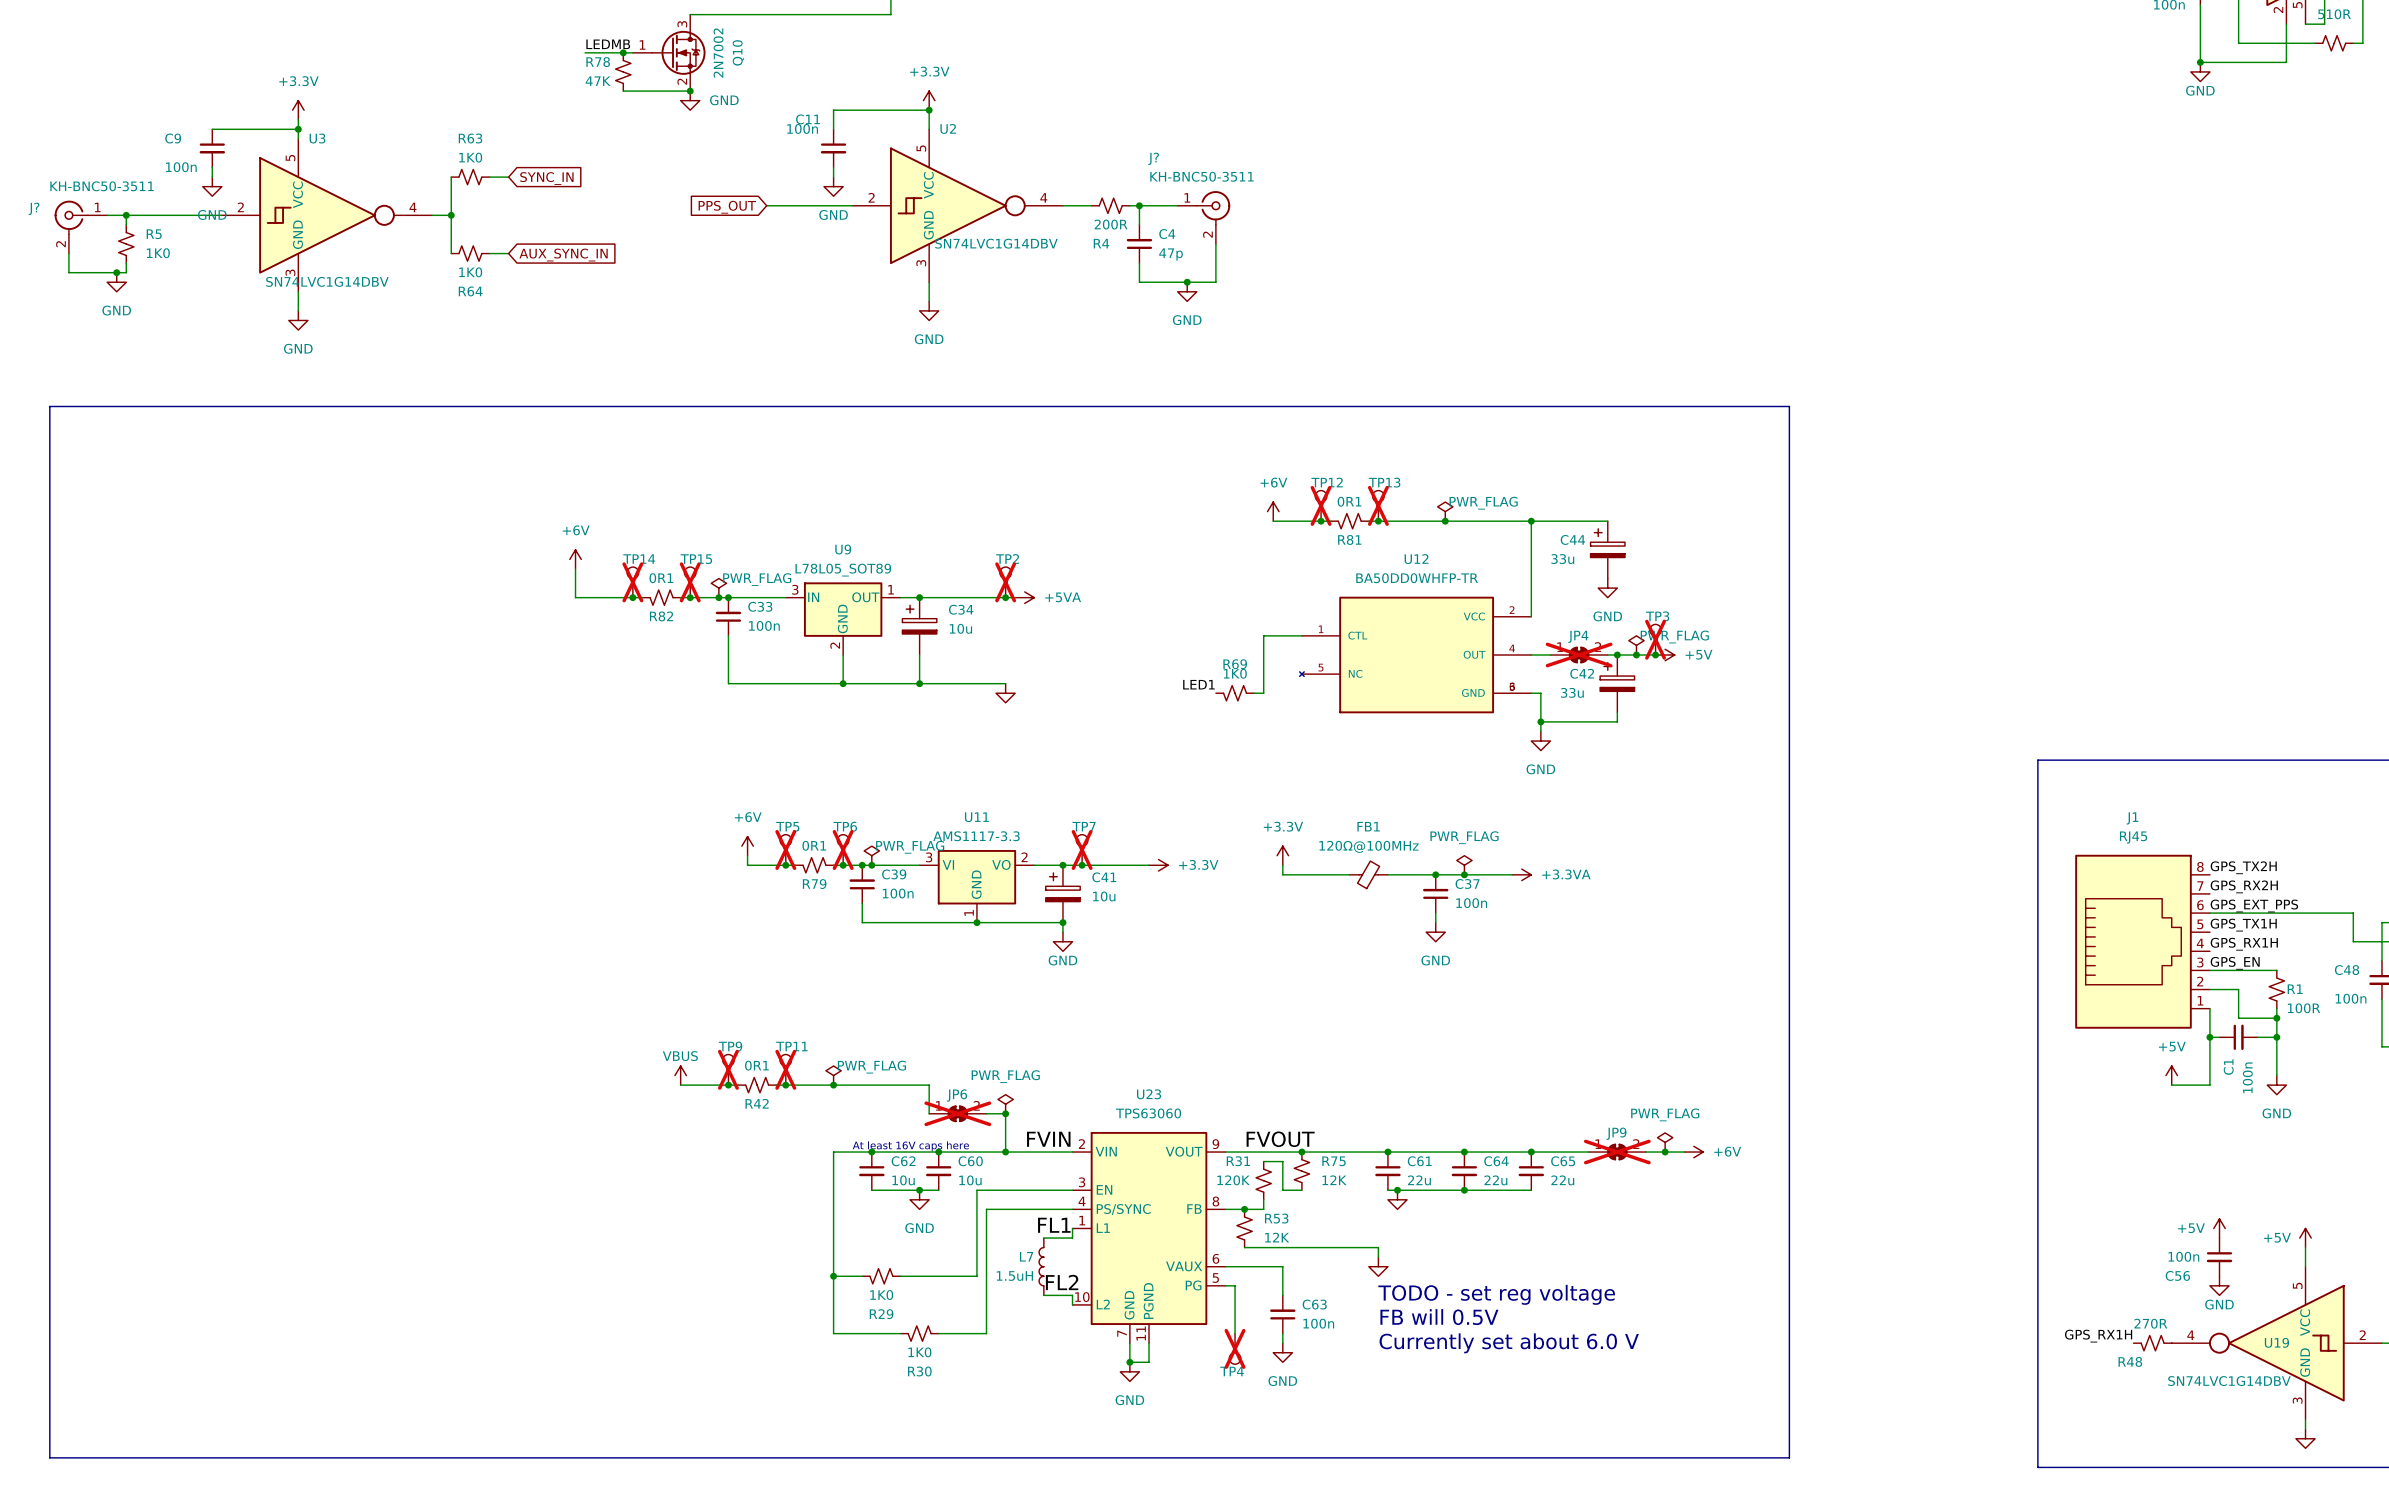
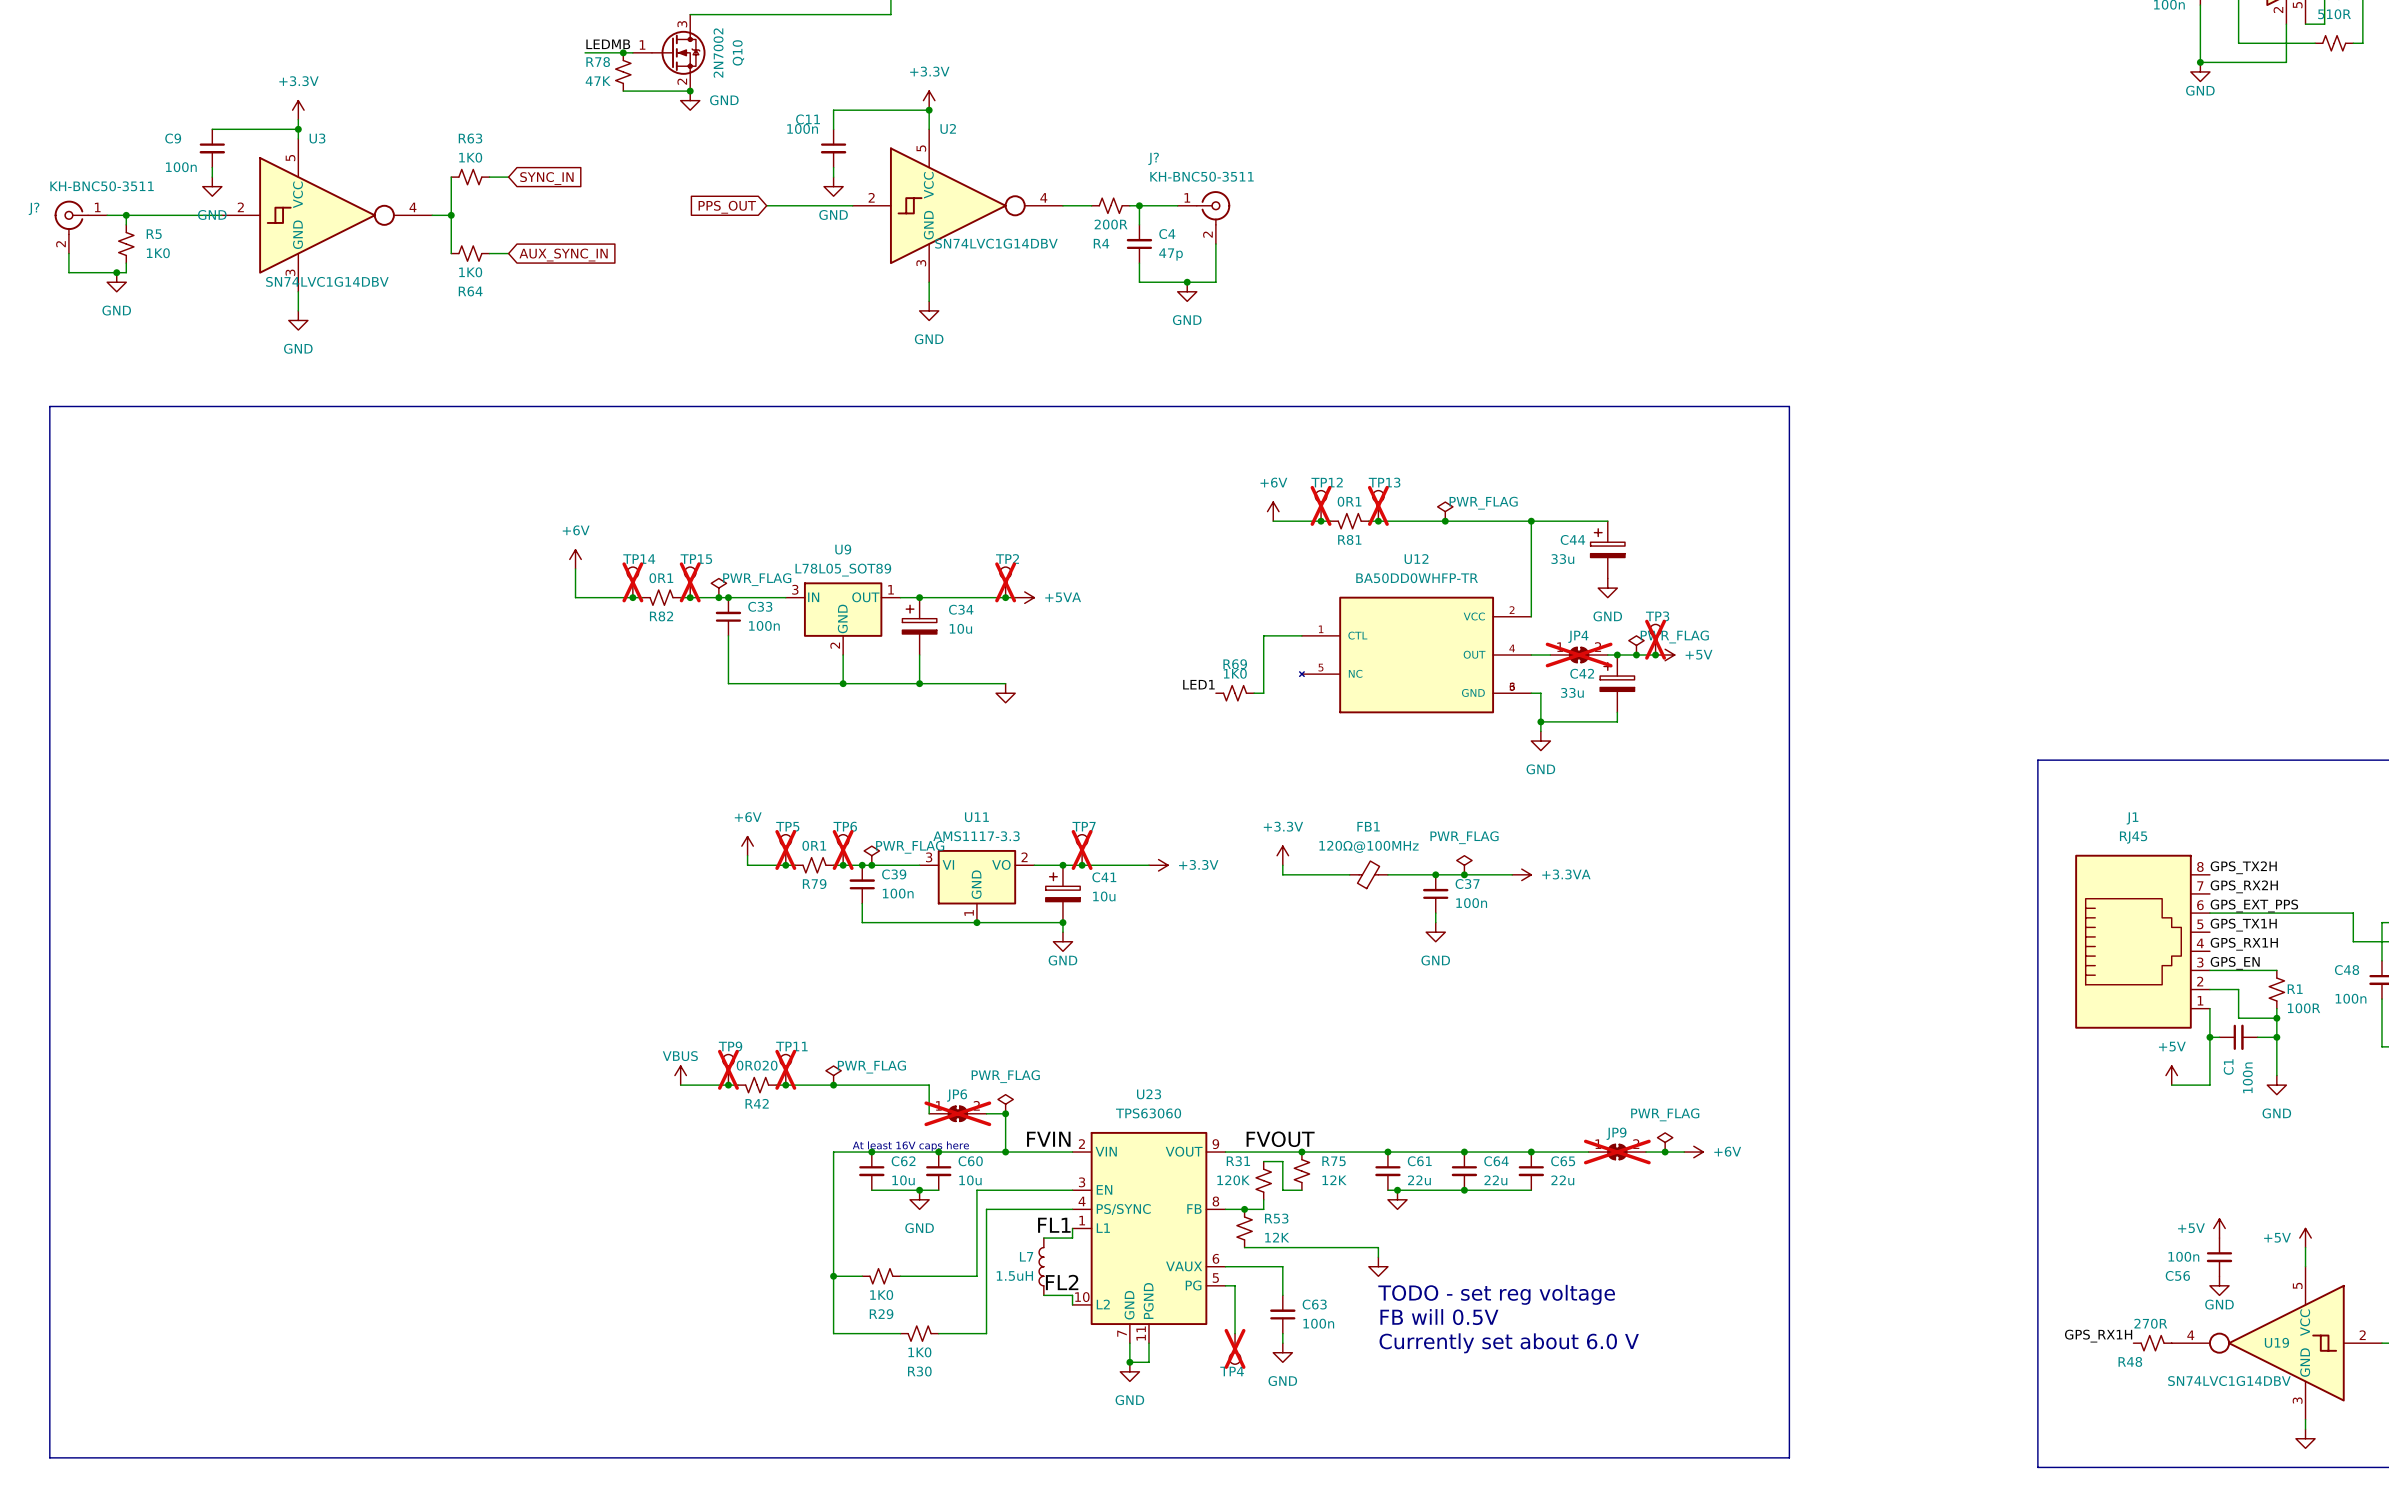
R42 value: 0R1 (756, 1065) -> 0R020 (757, 1065)

